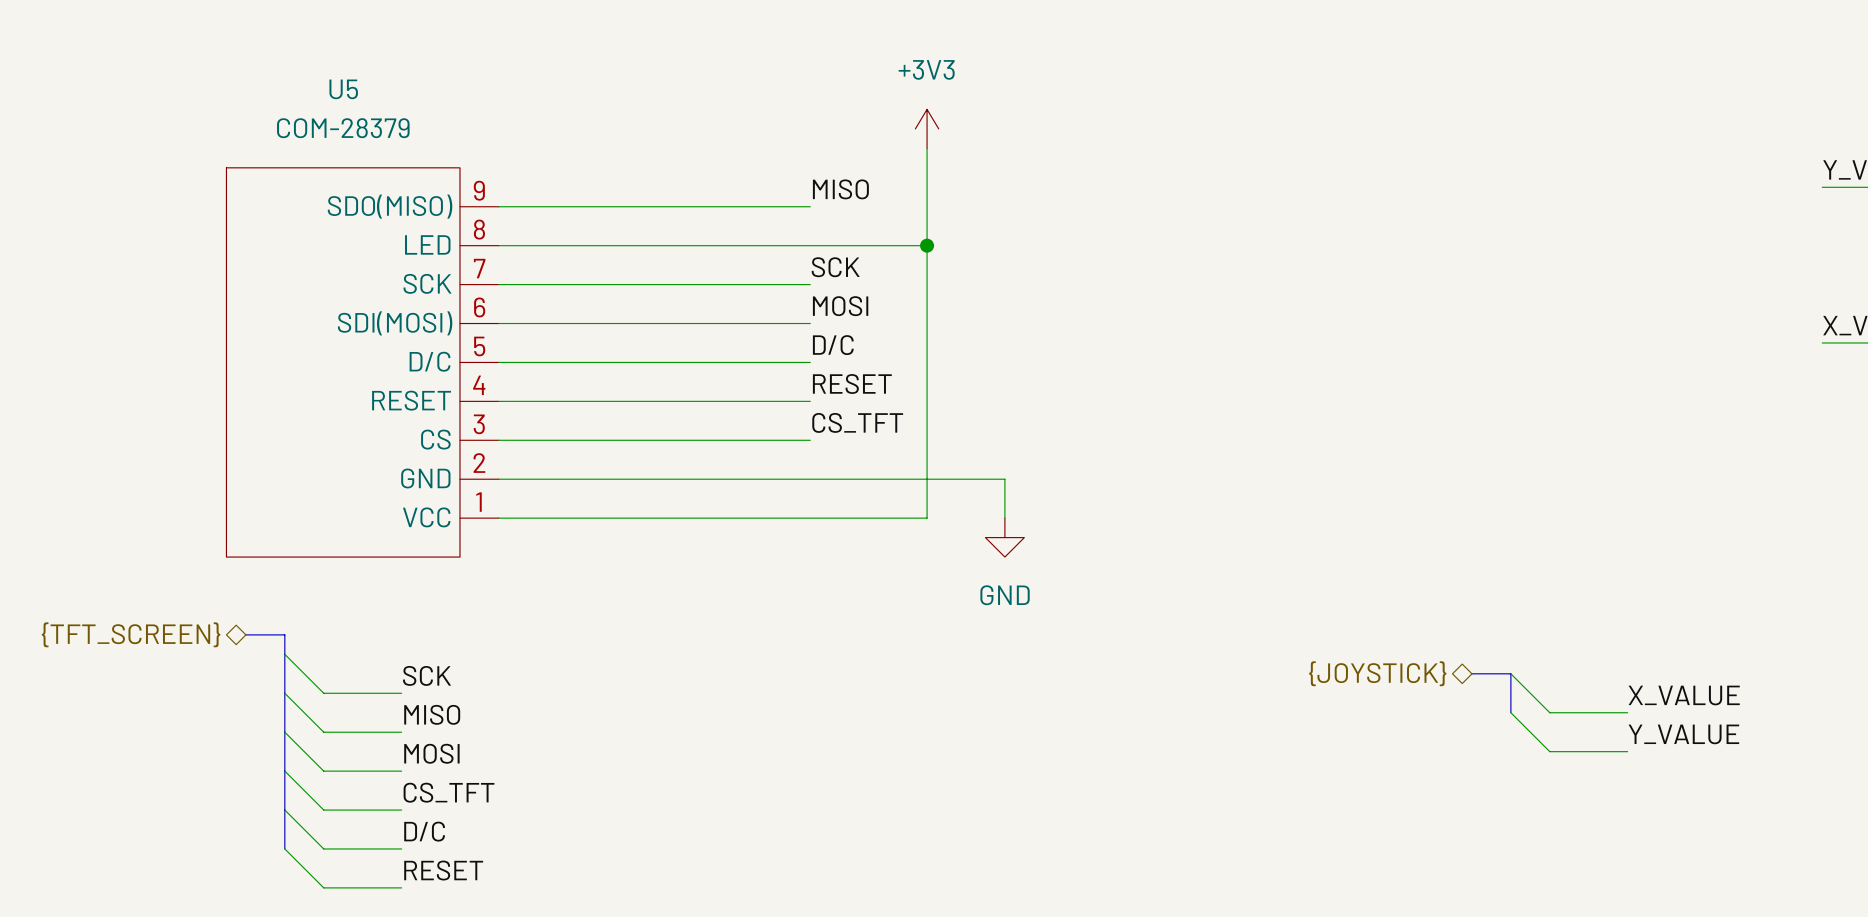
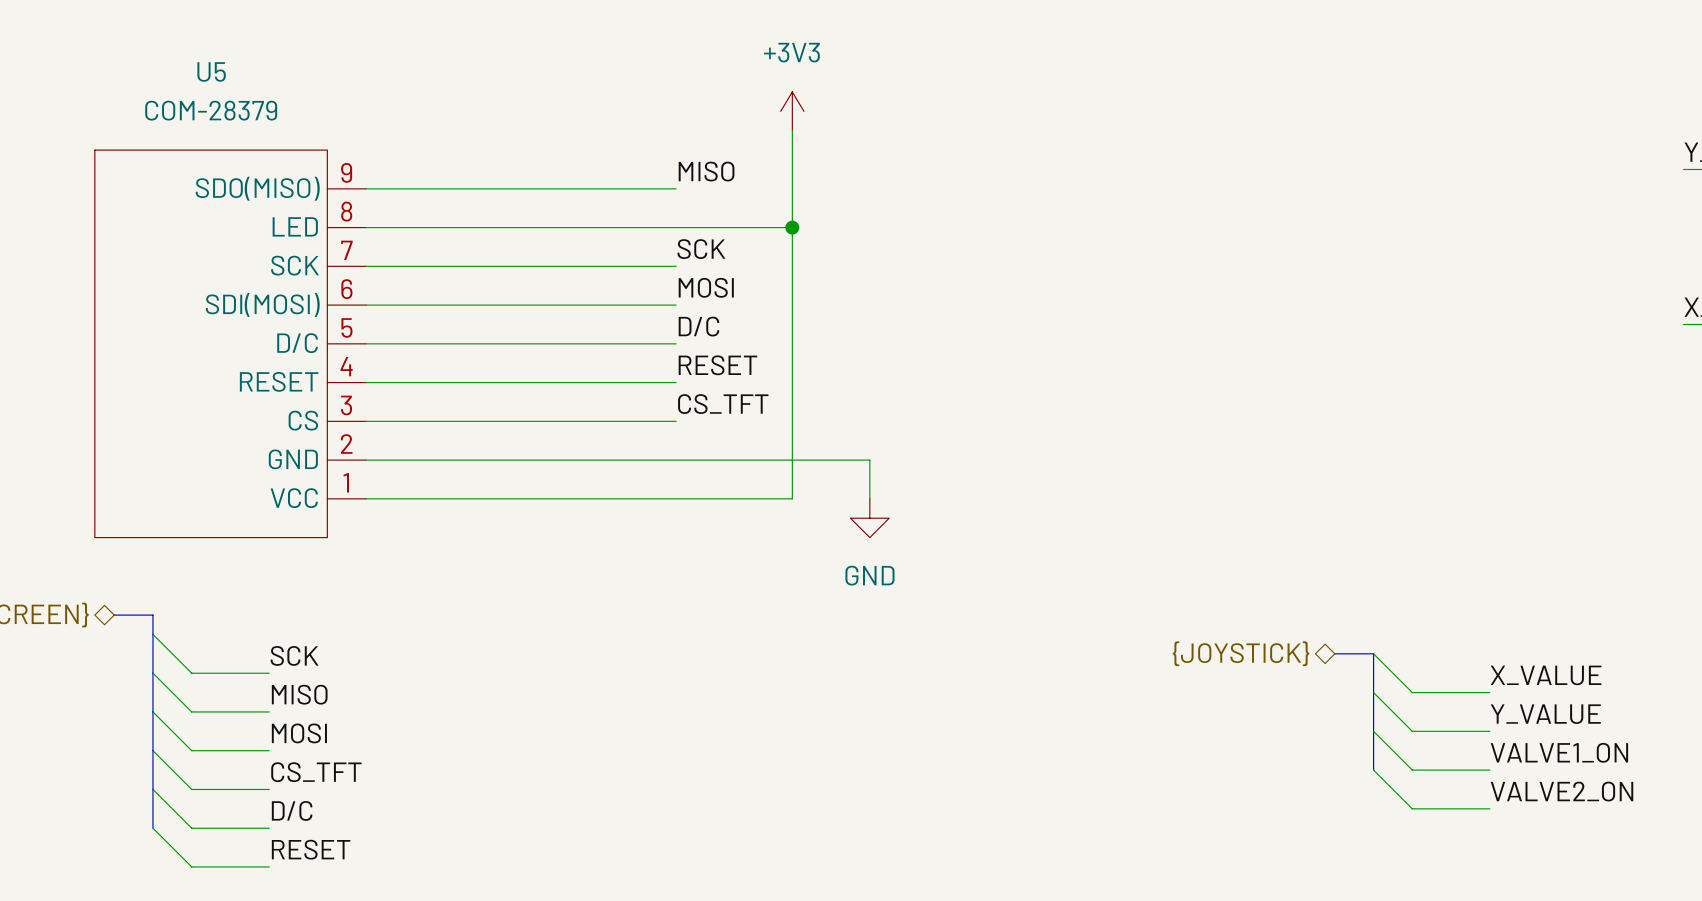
bus: none -> (1373, 692) (1373, 770)
wire: none -> (1373, 731) (1412, 770) (1489, 770)
label: none -> VALVE1_ON (1559, 752)
wire: none -> (1373, 770) (1412, 808) (1489, 808)
label: none -> VALVE2_ON (1562, 791)

